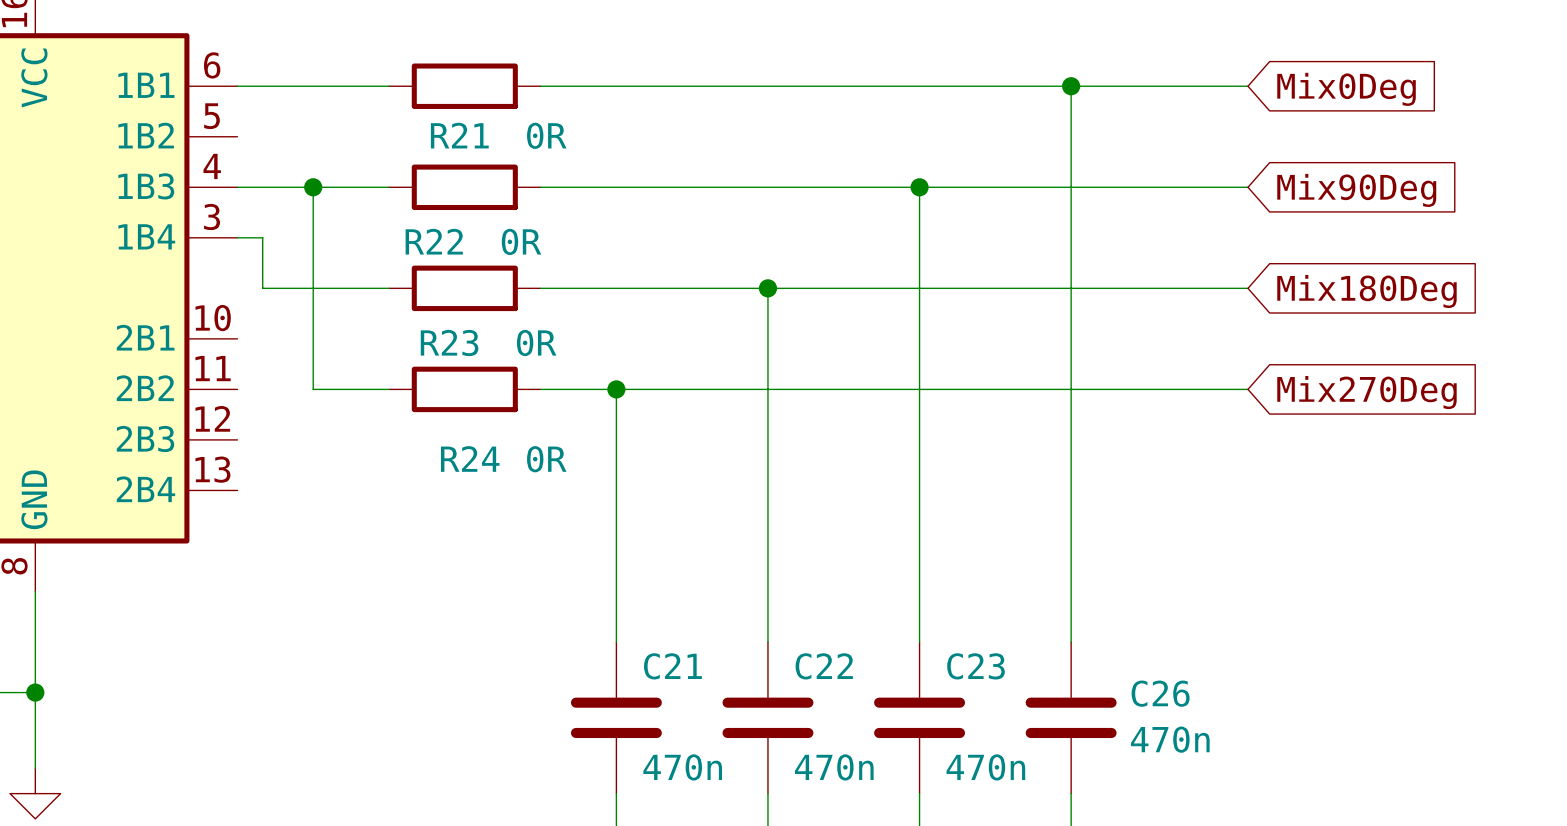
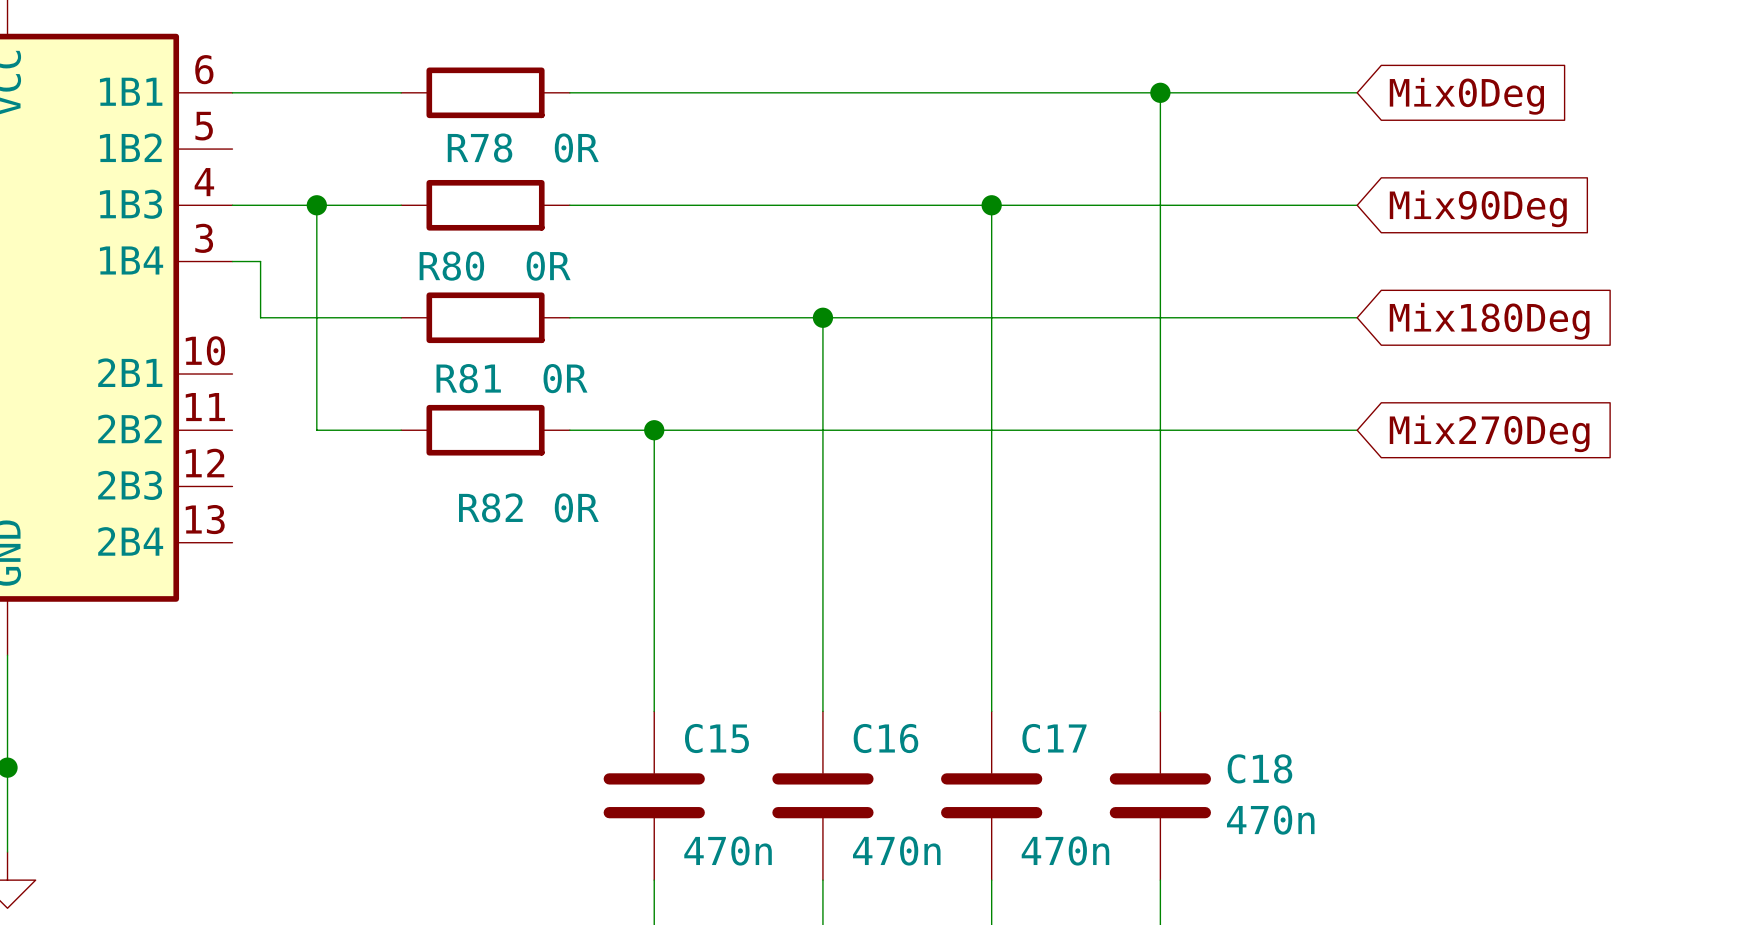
R21 name: R21 (459, 135) -> R78 (480, 148)
R22 name: R22 (434, 241) -> R80 (451, 266)
R23 name: R23 (449, 343) -> R81 (468, 378)
R24 name: R24 (470, 458) -> R82 (490, 507)
C21 name: C21 (672, 666) -> C15 (716, 738)
C22 name: C22 (824, 666) -> C16 (885, 738)
C23 name: C23 (975, 666) -> C17 (1054, 738)
C26 name: C26 (1160, 693) -> C18 (1259, 768)

